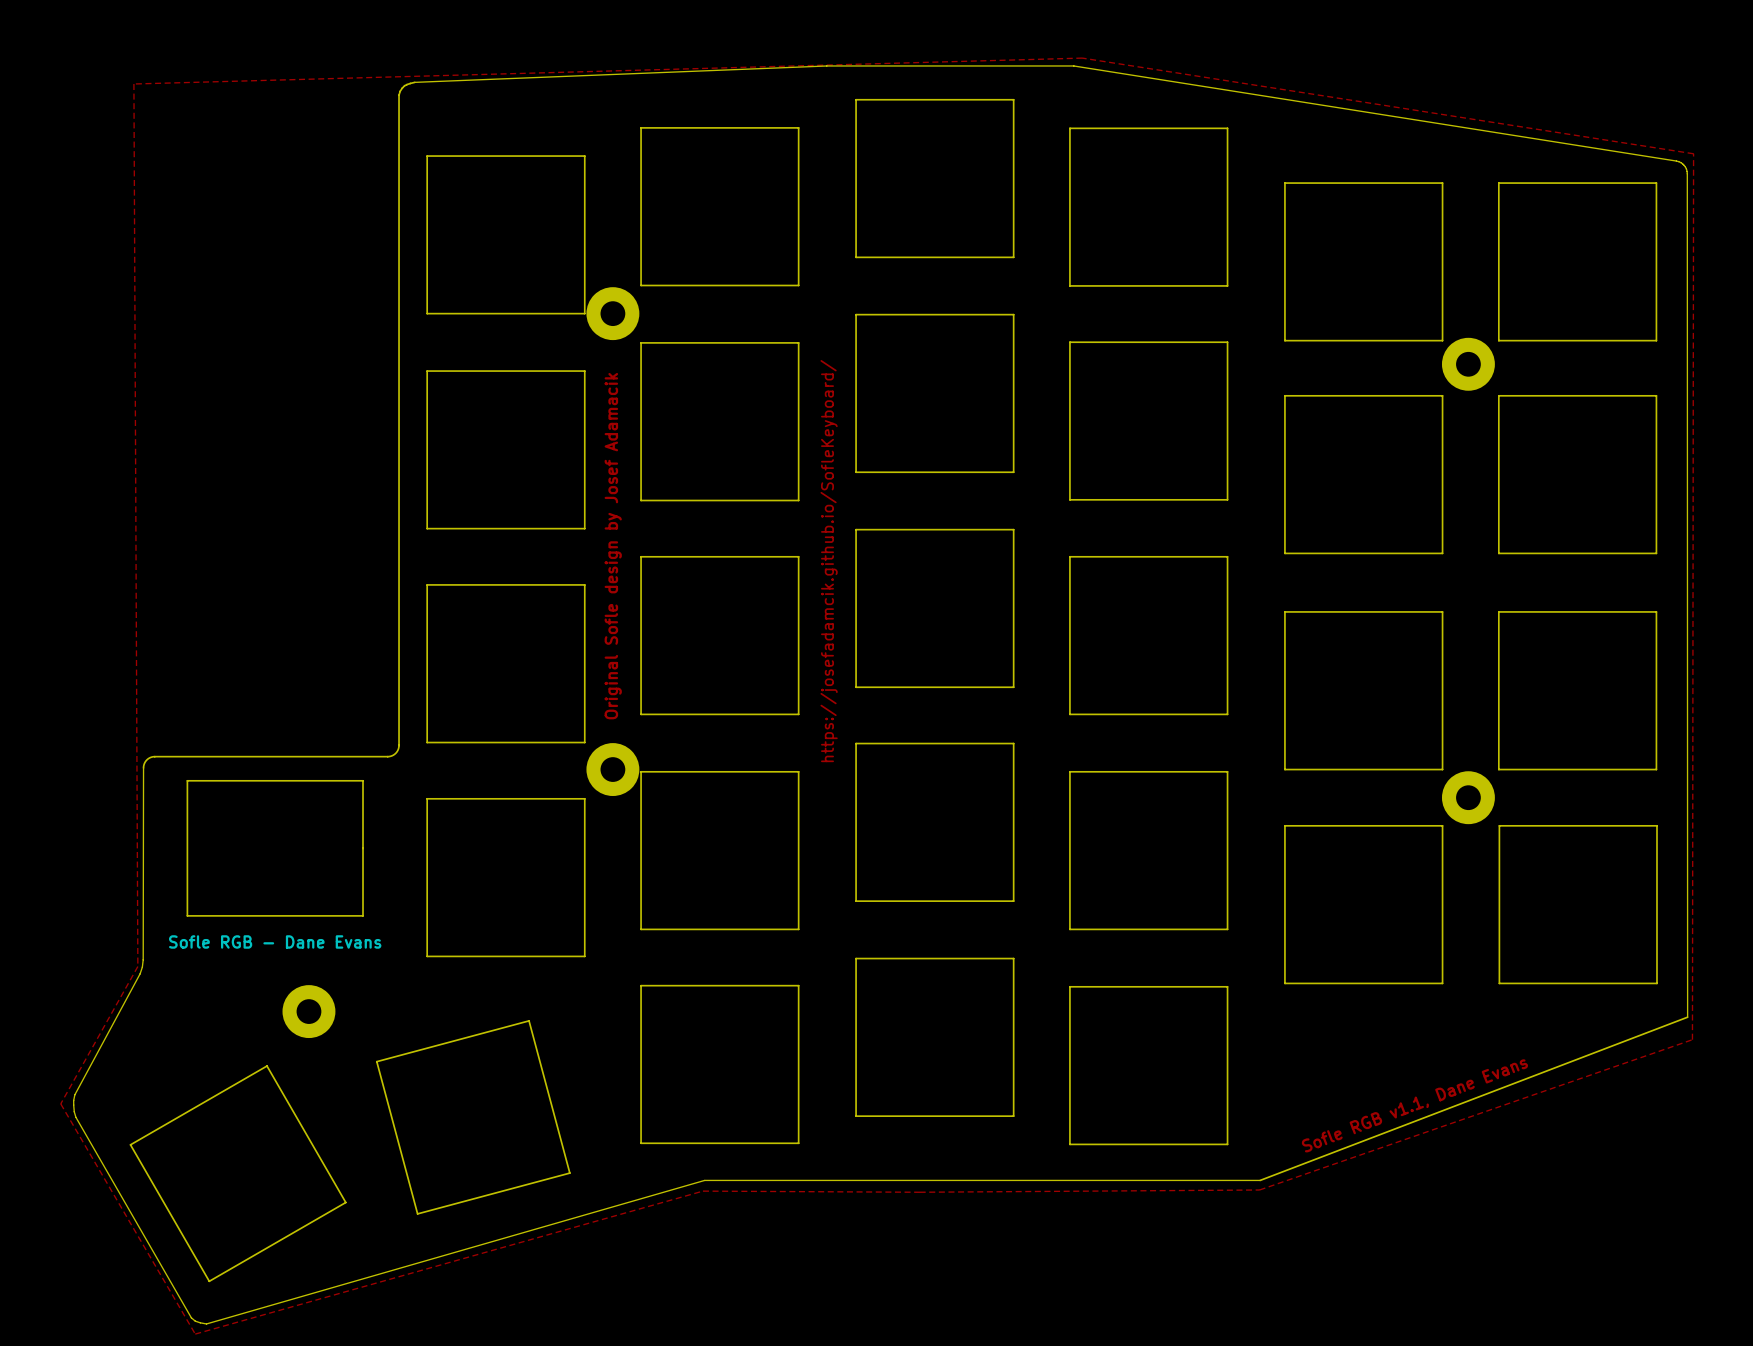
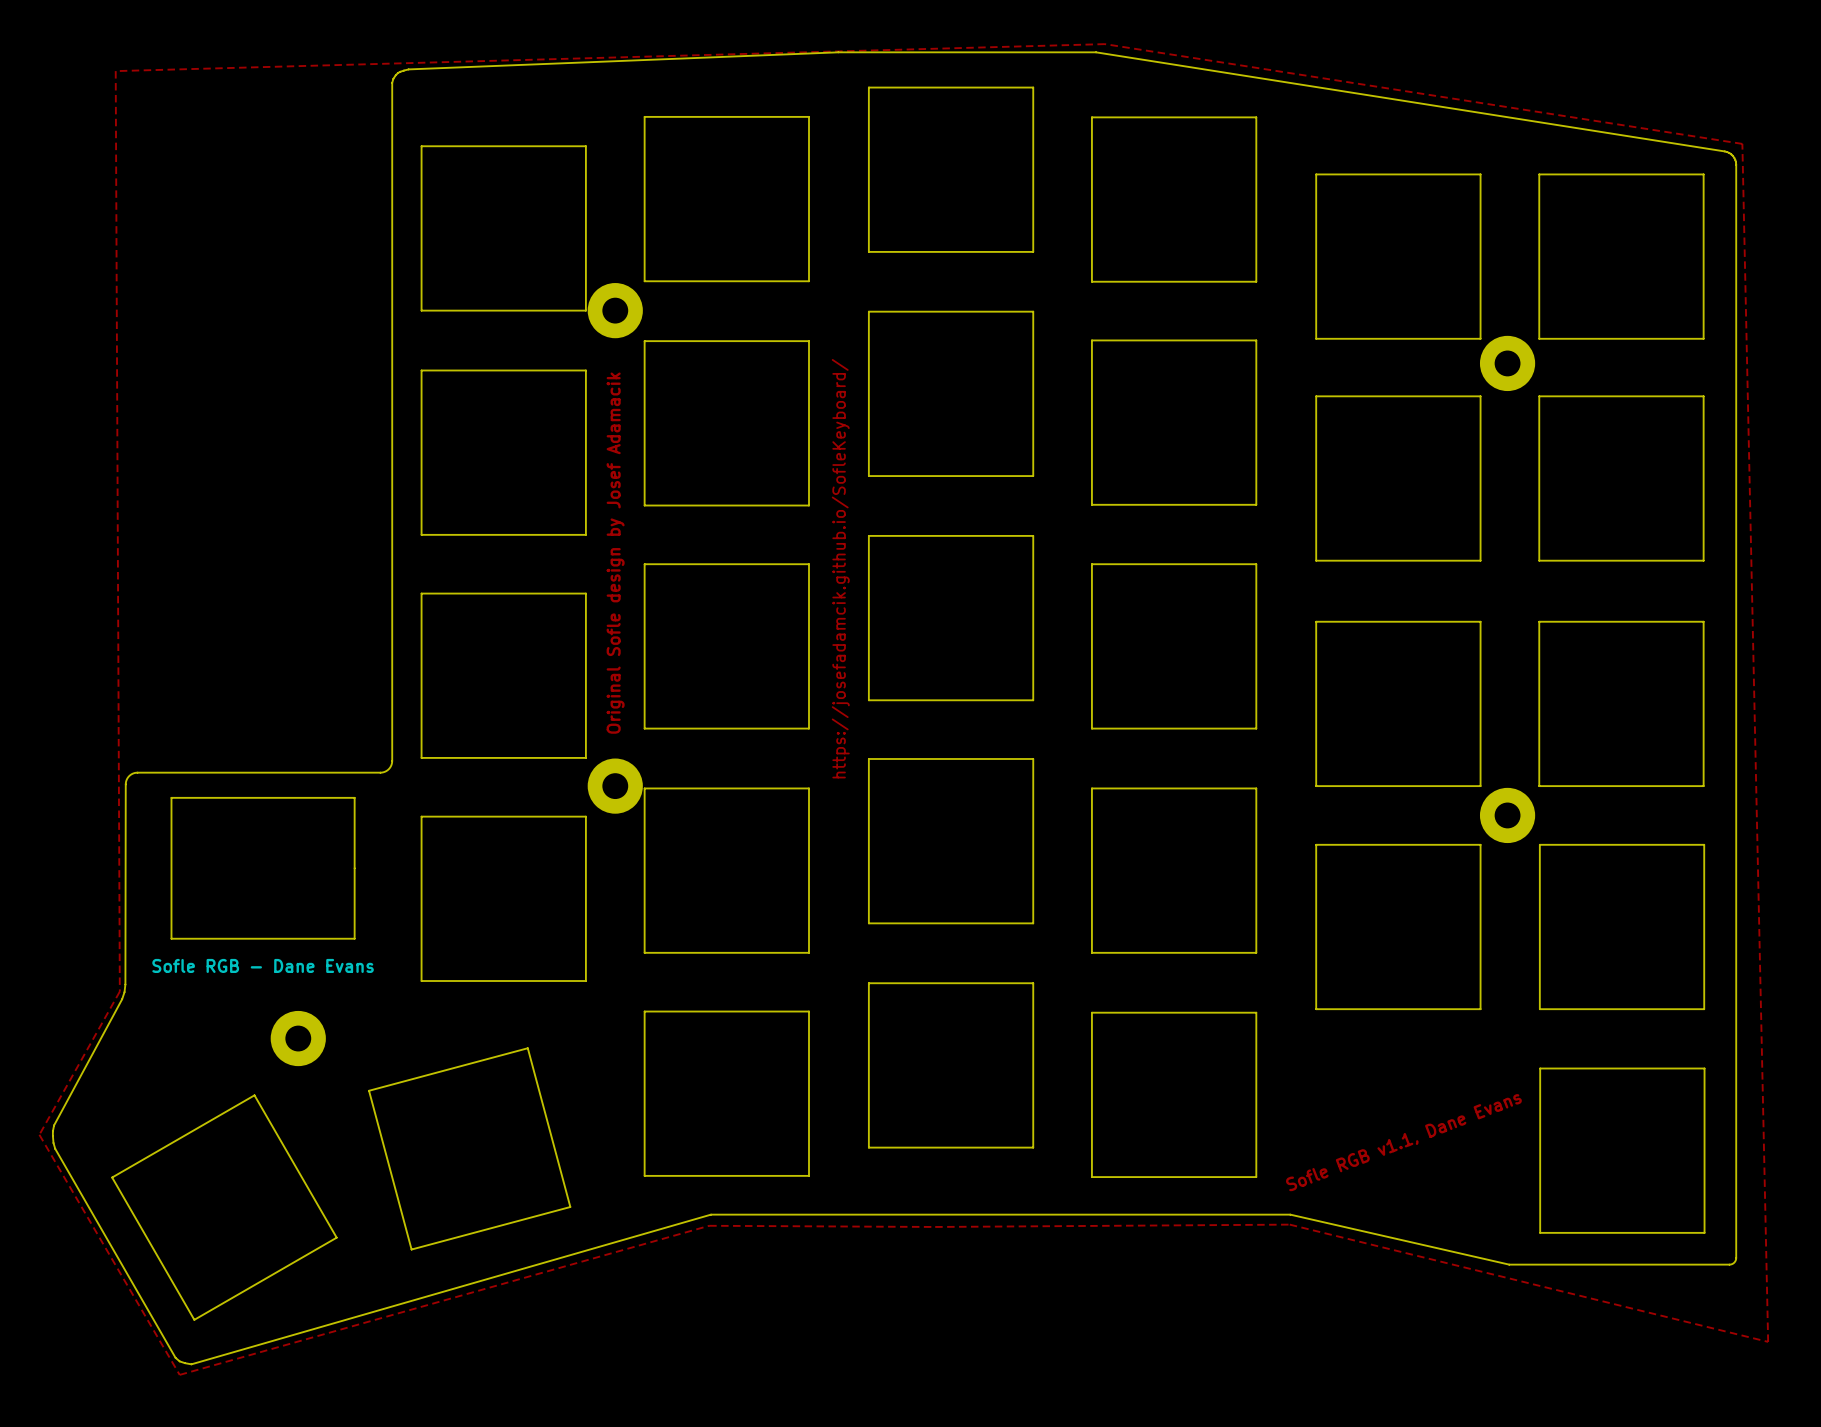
board edge: (1073, 65) (1676, 161) (1682, 163) (1687, 171) (1687, 1017) (1260, 1180) -> (1096, 52) (1724, 151) (1731, 154) (1736, 162) (1735, 1260) (1729, 1264) (1509, 1264) (1290, 1214)
zone outline: (1693, 153) (1692, 1039) (1259, 1189) -> (1742, 143) (1768, 1341) (1289, 1224)
board edge: none -> (1540, 1068) (1540, 1232) (1704, 1232) (1704, 1068) (1540, 1068)
text position: Sofle RGB v1.1, Dane Evans (1414, 1105) -> Sofle RGB v1.1, Dane Evans (1403, 1142)

